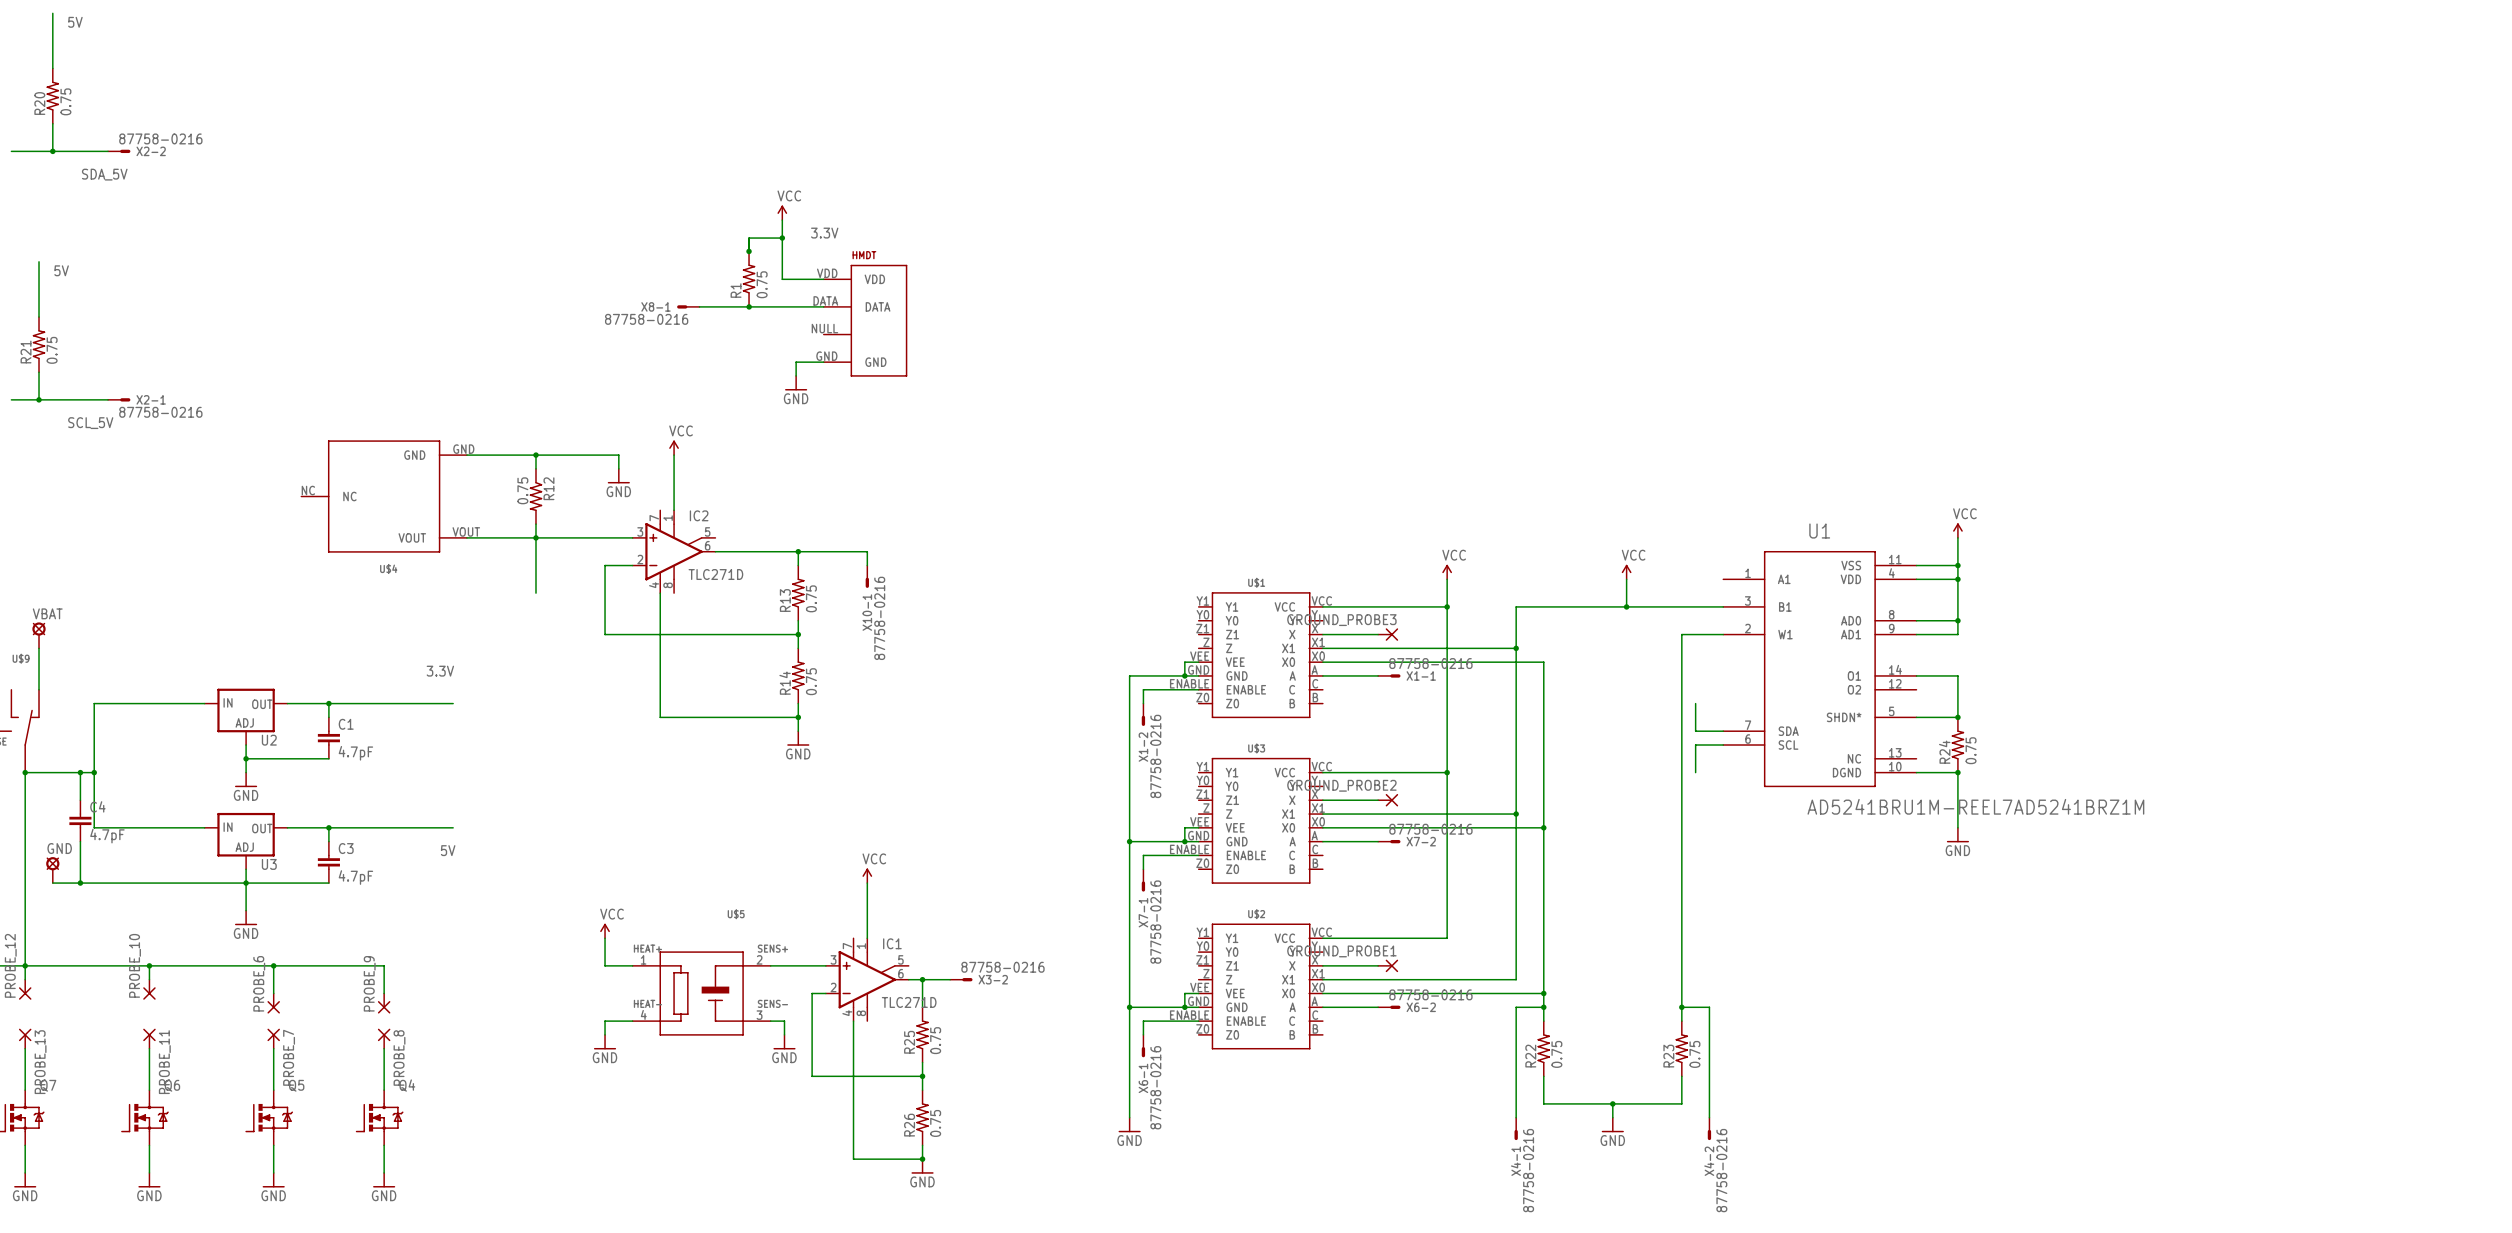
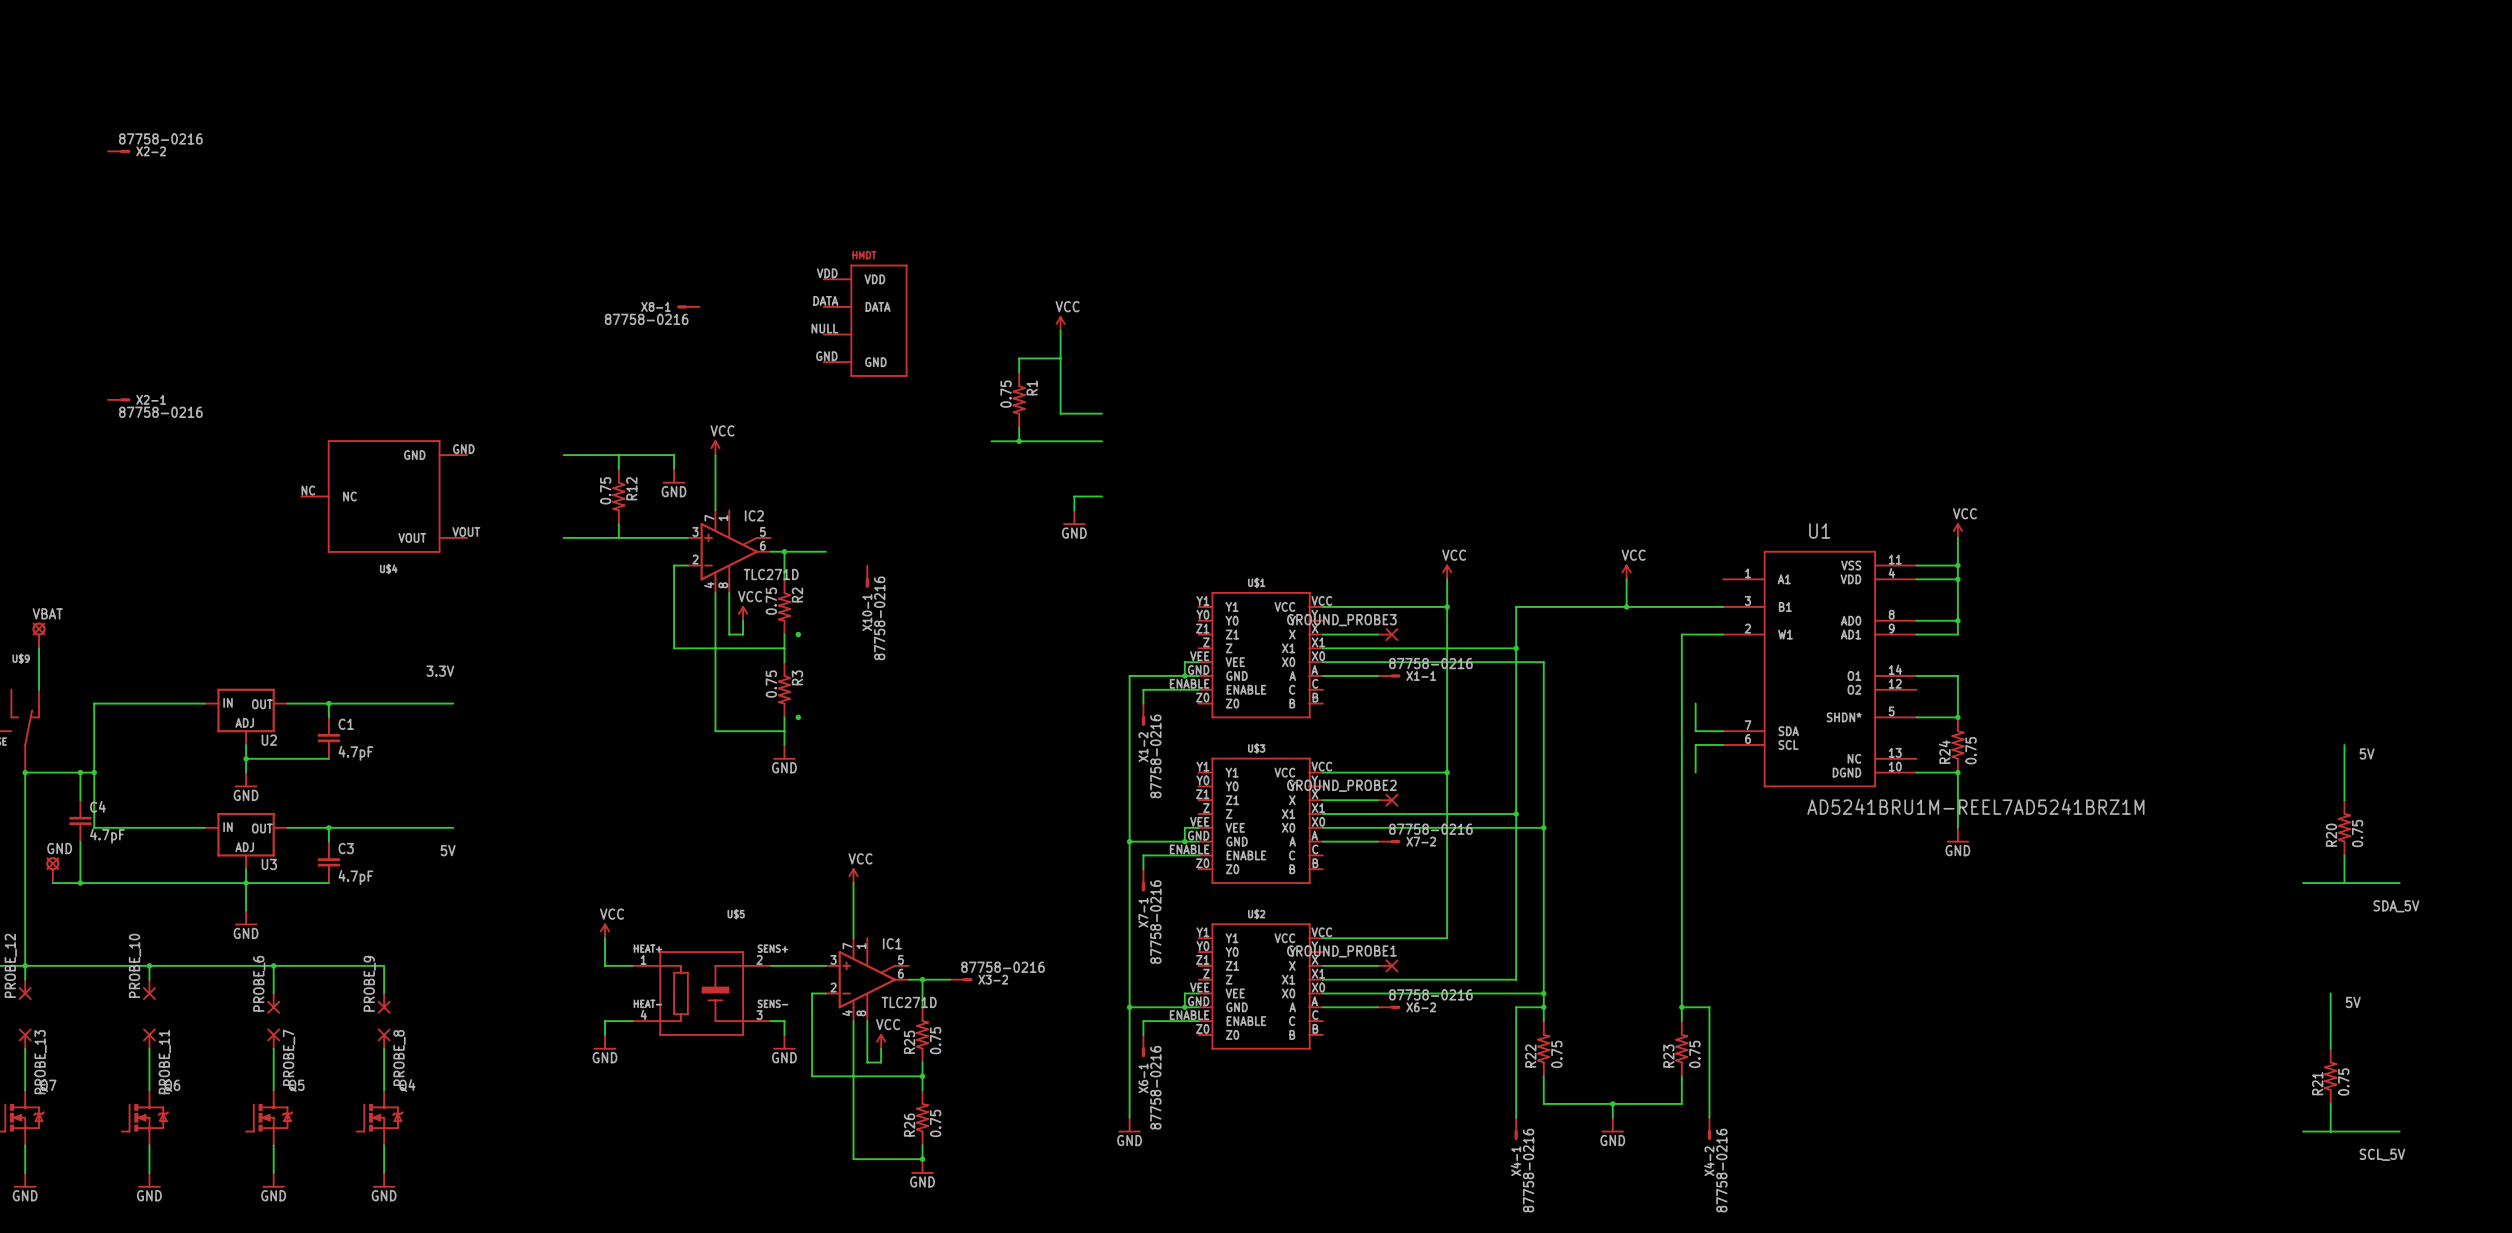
wire: (52, 13) (52, 68) -> none
label: 5V (75, 22) -> none
R20 position: (52, 96) -> (2344, 827)
wire: (52, 123) (52, 151) -> none
wire: (11, 151) (108, 151) -> none
junction: (52, 151) -> none
label: SDA_5V (104, 174) -> none
power symbol: VCC (782, 212) -> none
wire: (782, 220) (782, 279) (823, 279) -> none
label: 3.3V (824, 233) -> none
wire: (782, 238) (749, 238) (749, 251) -> none
junction: (782, 238) -> none
wire: (749, 240) (749, 240) -> none
junction: (749, 251) -> none
wire: (39, 261) (39, 317) -> none
label: 5V (61, 270) -> none
R1 rotation: 0° (749, 279) -> 180° (1019, 399)
R1 position: (749, 279) -> (1019, 399)
wire: (699, 306) (823, 306) -> none
junction: (749, 306) -> none
power symbol: none -> VCC (1060, 323)
wire: none -> (1060, 330) (1060, 413) (1102, 413)
R21 position: (39, 344) -> (2330, 1076)
wire: none -> (1060, 358) (1019, 358) (1019, 372)
wire: (823, 362) (796, 362) (796, 375) -> none
wire: (39, 372) (39, 399) -> none
power symbol: GND (796, 383) -> none
wire: (11, 399) (108, 399) -> none
junction: (39, 399) -> none
label: SCL_5V (90, 423) -> none
wire: none -> (1019, 427) (1019, 441)
wire: none -> (991, 441) (1102, 441)
junction: none -> (1019, 441)
power symbol position: VCC (674, 447) -> VCC (715, 447)
wire: (466, 455) (563, 455) -> none
wire: (535, 455) (535, 468) -> (618, 524) (618, 537)
junction: (535, 455) -> none
wire: none -> (618, 455) (674, 455)
wire: none -> (715, 455) (715, 510)
wire: (674, 468) (674, 510) -> none
power symbol position: GND (618, 476) -> GND (674, 476)
R12 position: (535, 496) -> (618, 496)
wire: none -> (1102, 496) (1074, 496) (1074, 510)
power symbol: none -> GND (1074, 517)
wire: (535, 524) (535, 593) -> none
wire: (466, 537) (563, 537) -> none
junction: (535, 537) -> none
IC2 position: (674, 551) -> (729, 551)
wire: (715, 551) (770, 551) -> (632, 537) (687, 537)
wire: none -> (784, 551) (784, 579)
wire: (798, 551) (798, 565) -> none
junction position: (798, 551) -> (784, 551)
wire: (825, 551) (867, 551) (867, 565) -> none
wire: (632, 565) (605, 565) (605, 634) (729, 634) -> (729, 593) (729, 634)
wire: none -> (687, 565) (674, 565) (674, 648) (784, 648)
wire: (660, 593) (660, 717) (798, 717) -> none
wire: none -> (715, 593) (715, 731) (784, 731)
R13: 0.75 (798, 593) -> none
R2: none -> 0.75 (784, 606)
power symbol: none -> VCC (743, 613)
wire: (798, 620) (798, 648) -> (784, 634) (784, 662)
wire: (743, 634) (798, 634) -> (743, 634) (743, 620)
R14: 0.75 (798, 675) -> none
R3: none -> 0.75 (784, 689)
wire: (798, 703) (798, 731) -> (784, 717) (784, 745)
power symbol position: GND (798, 738) -> GND (784, 752)
wire: none -> (2344, 745) (2344, 800)
label: none -> 5V (2367, 753)
wire: none -> (2344, 855) (2344, 883)
power symbol position: VCC (867, 875) -> VCC (853, 875)
wire: (867, 883) (867, 938) -> (853, 883) (853, 938)
wire: none -> (2303, 883) (2399, 883)
label: none -> SDA_5V (2396, 906)
wire: none -> (2330, 993) (2330, 1048)
label: none -> 5V (2353, 1002)
wire: none -> (867, 1021) (867, 1062) (881, 1062) (881, 1048)
power symbol: none -> VCC (881, 1041)
wire: none -> (2330, 1103) (2330, 1131)
wire: none -> (2303, 1131) (2399, 1131)
label: none -> SCL_5V (2382, 1154)

